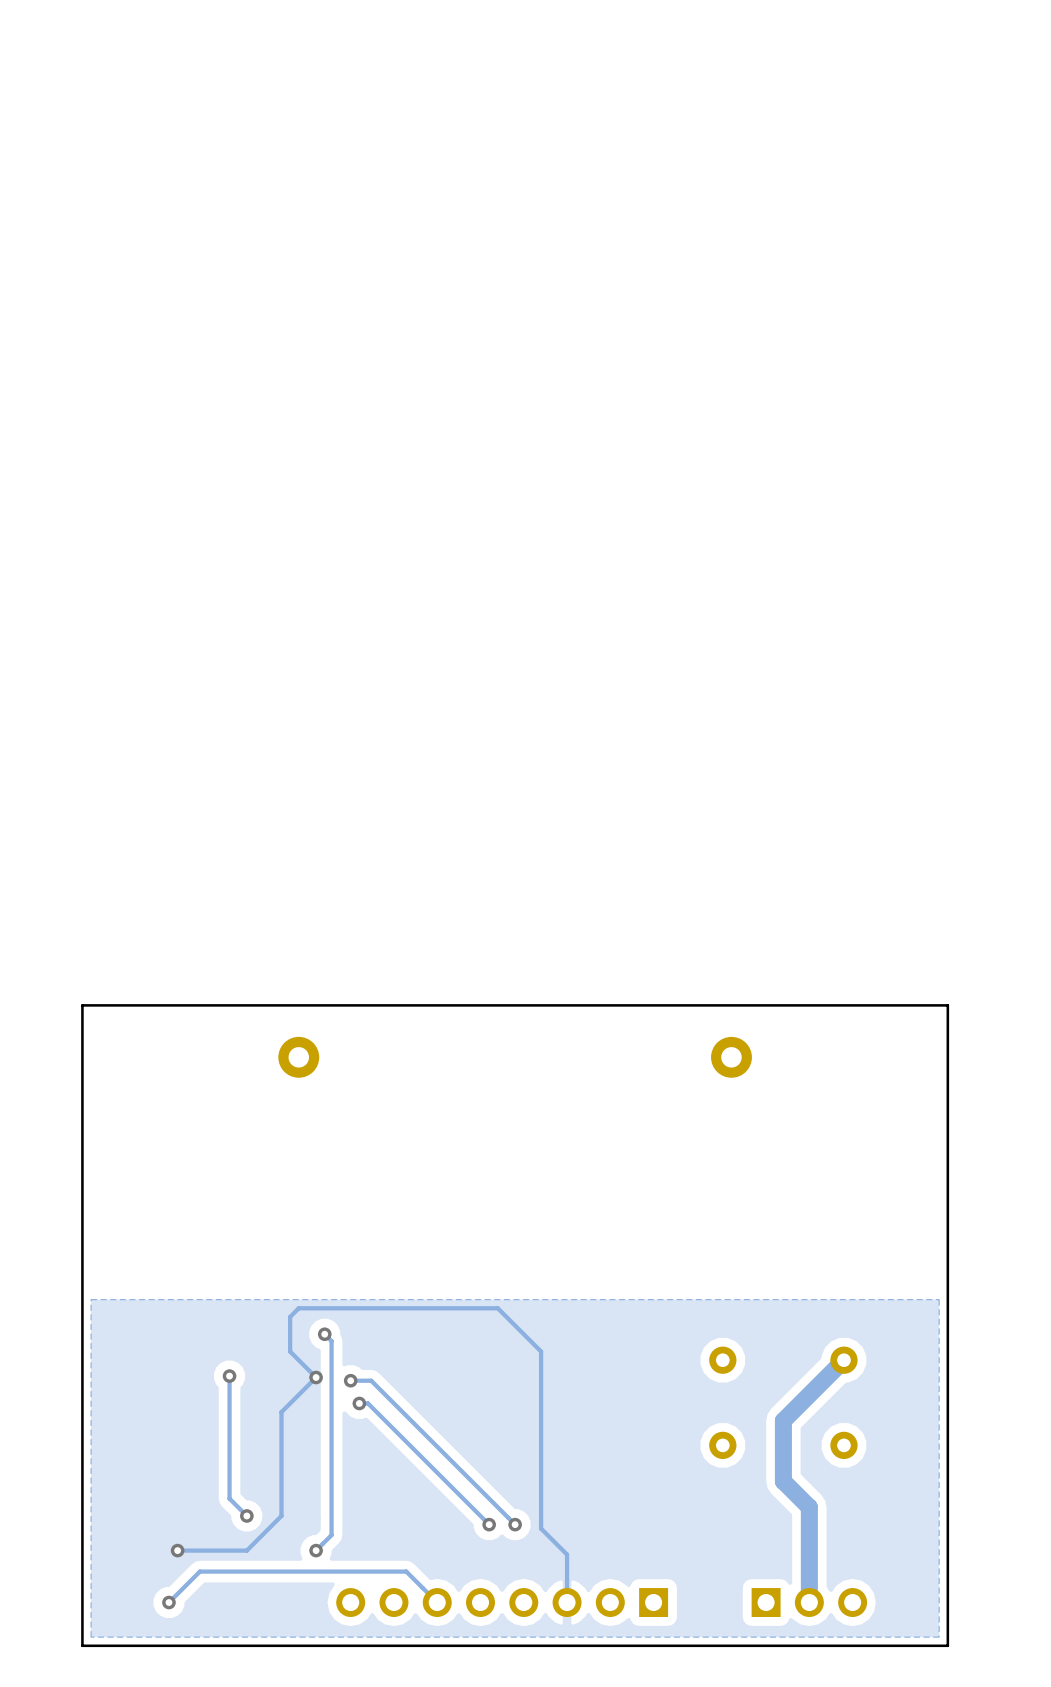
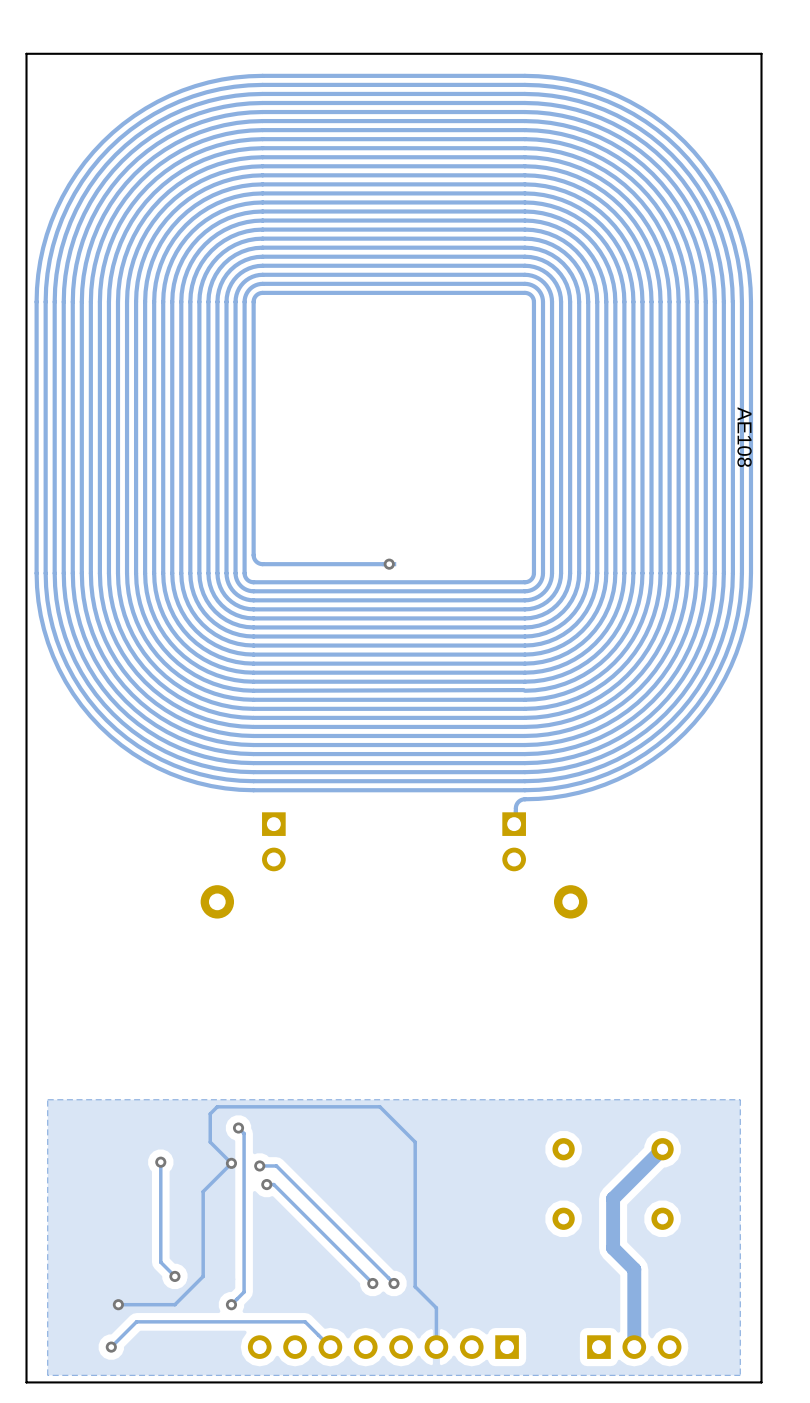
AE108: none -> (393, 449)
via: none -> (389, 564)
part: none -> (273, 841)
part: none -> (514, 841)
board edge: (947, 1645) (947, 1005) (82, 1005) (82, 1645) -> (747, 1382) (761, 1382) (761, 53) (26, 53) (26, 1382) (40, 1382)

